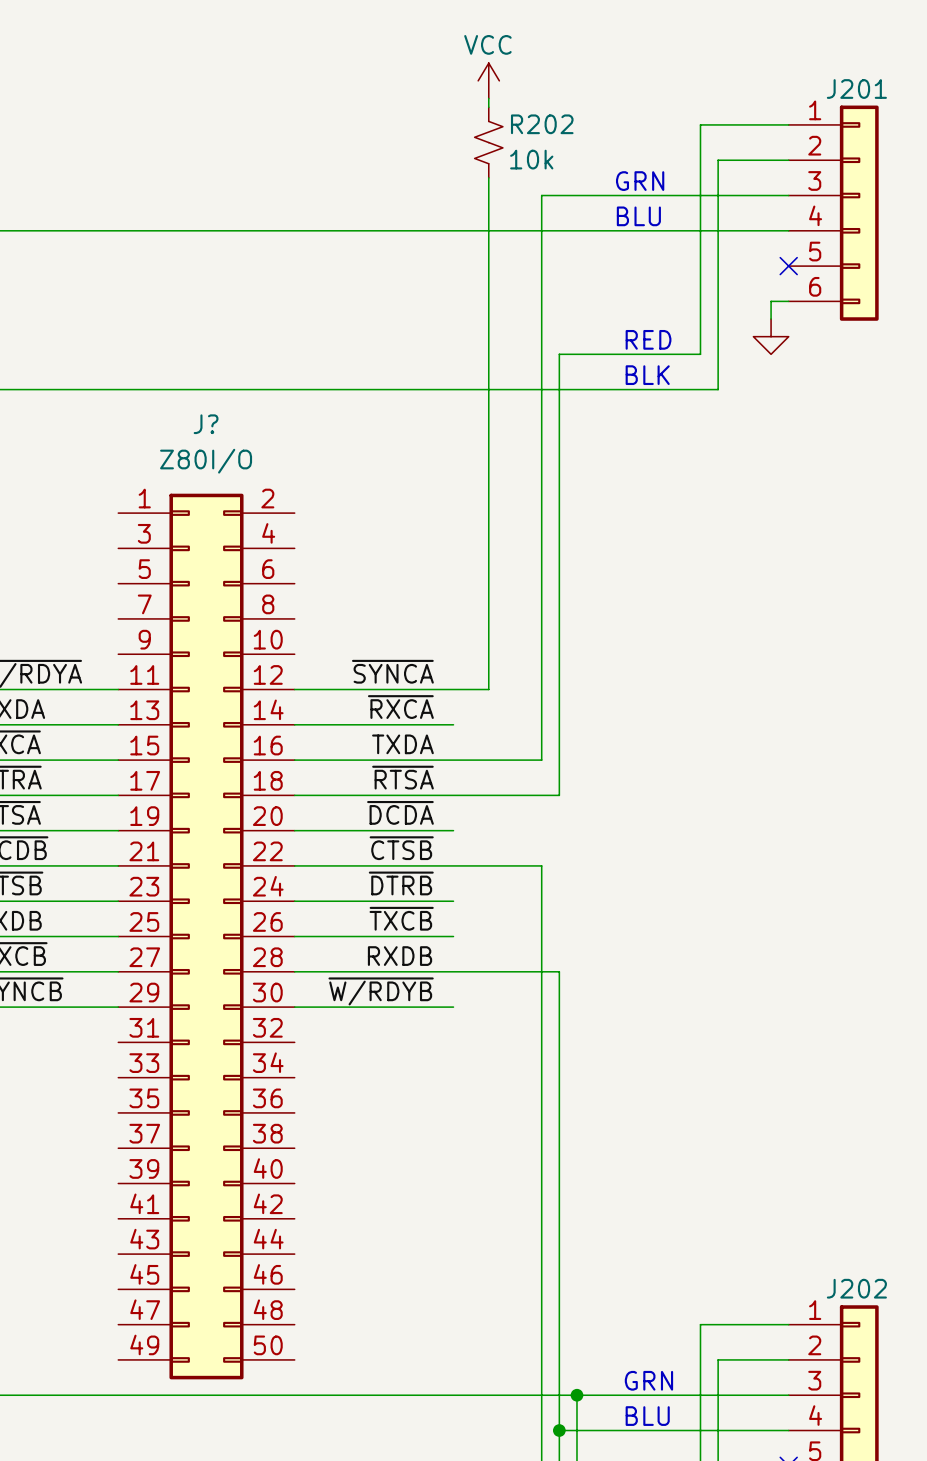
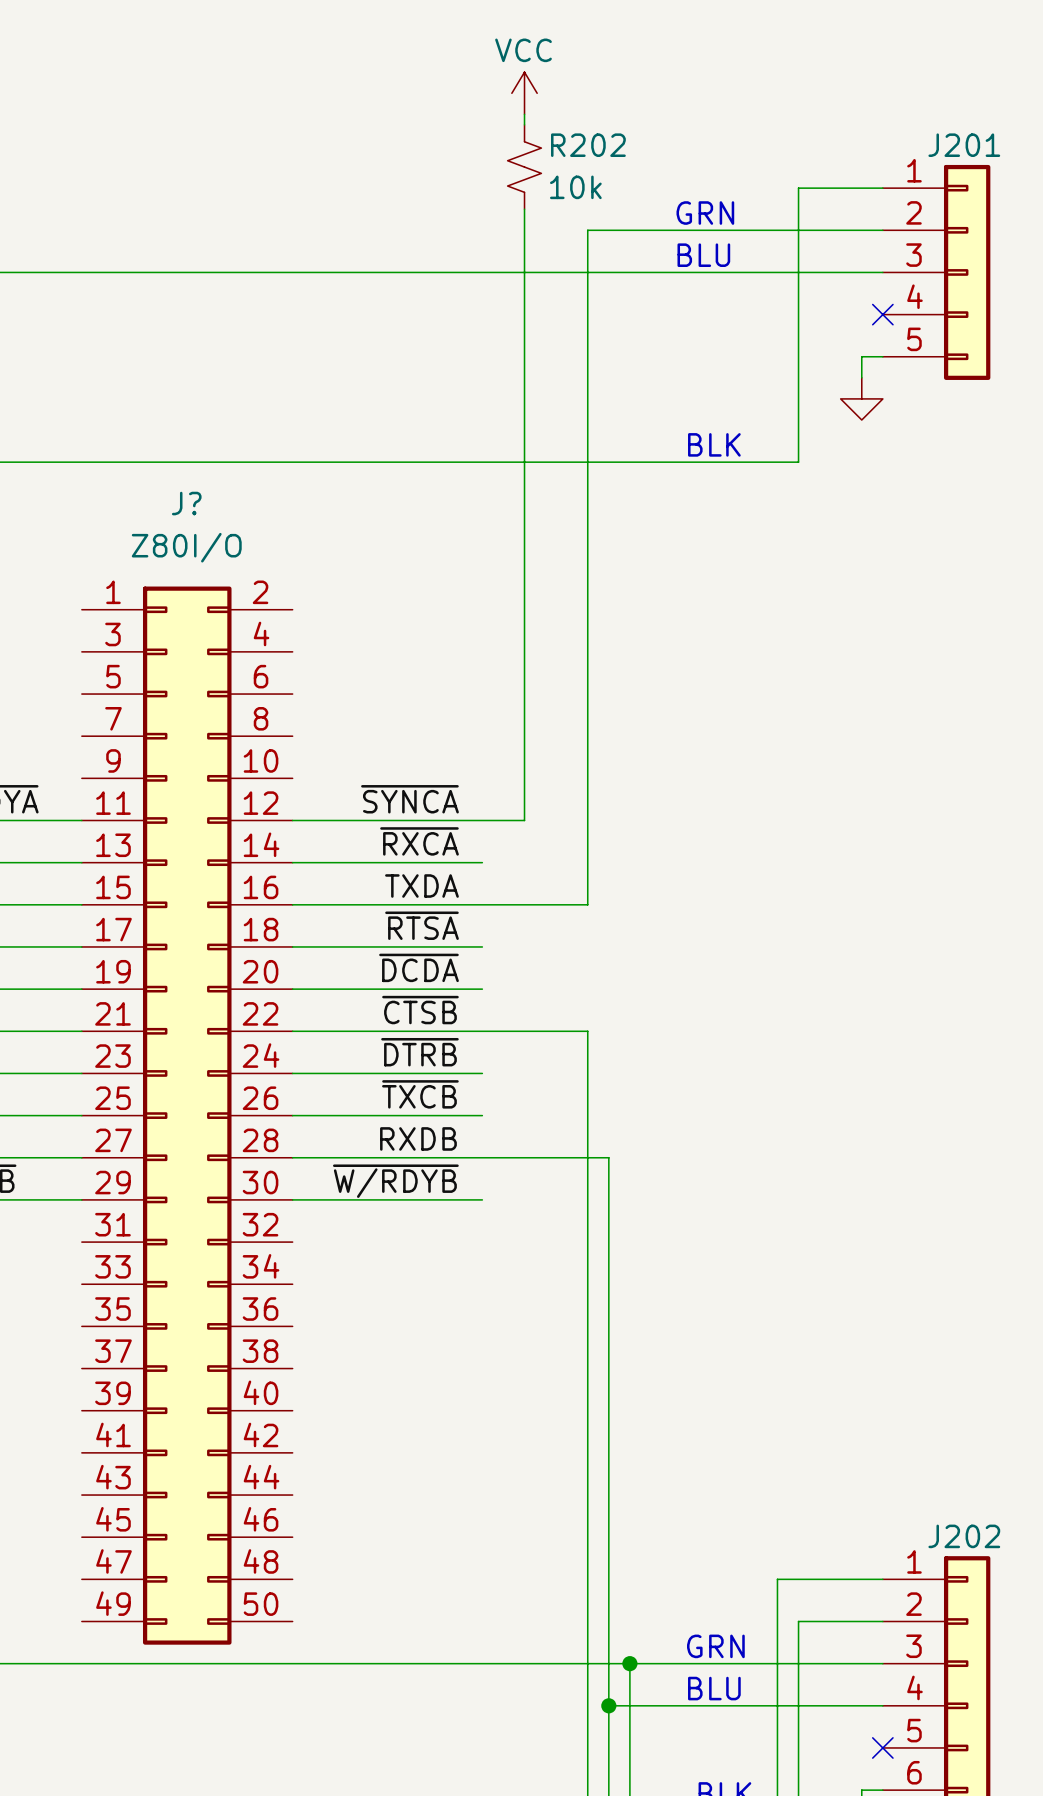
J201 symbol: [788, 105, 879, 321] -> [882, 164, 991, 380]
wire: (788, 124) (700, 124) (700, 354) (559, 354) (559, 795) (453, 795) -> none
text: RED (648, 339) -> none

